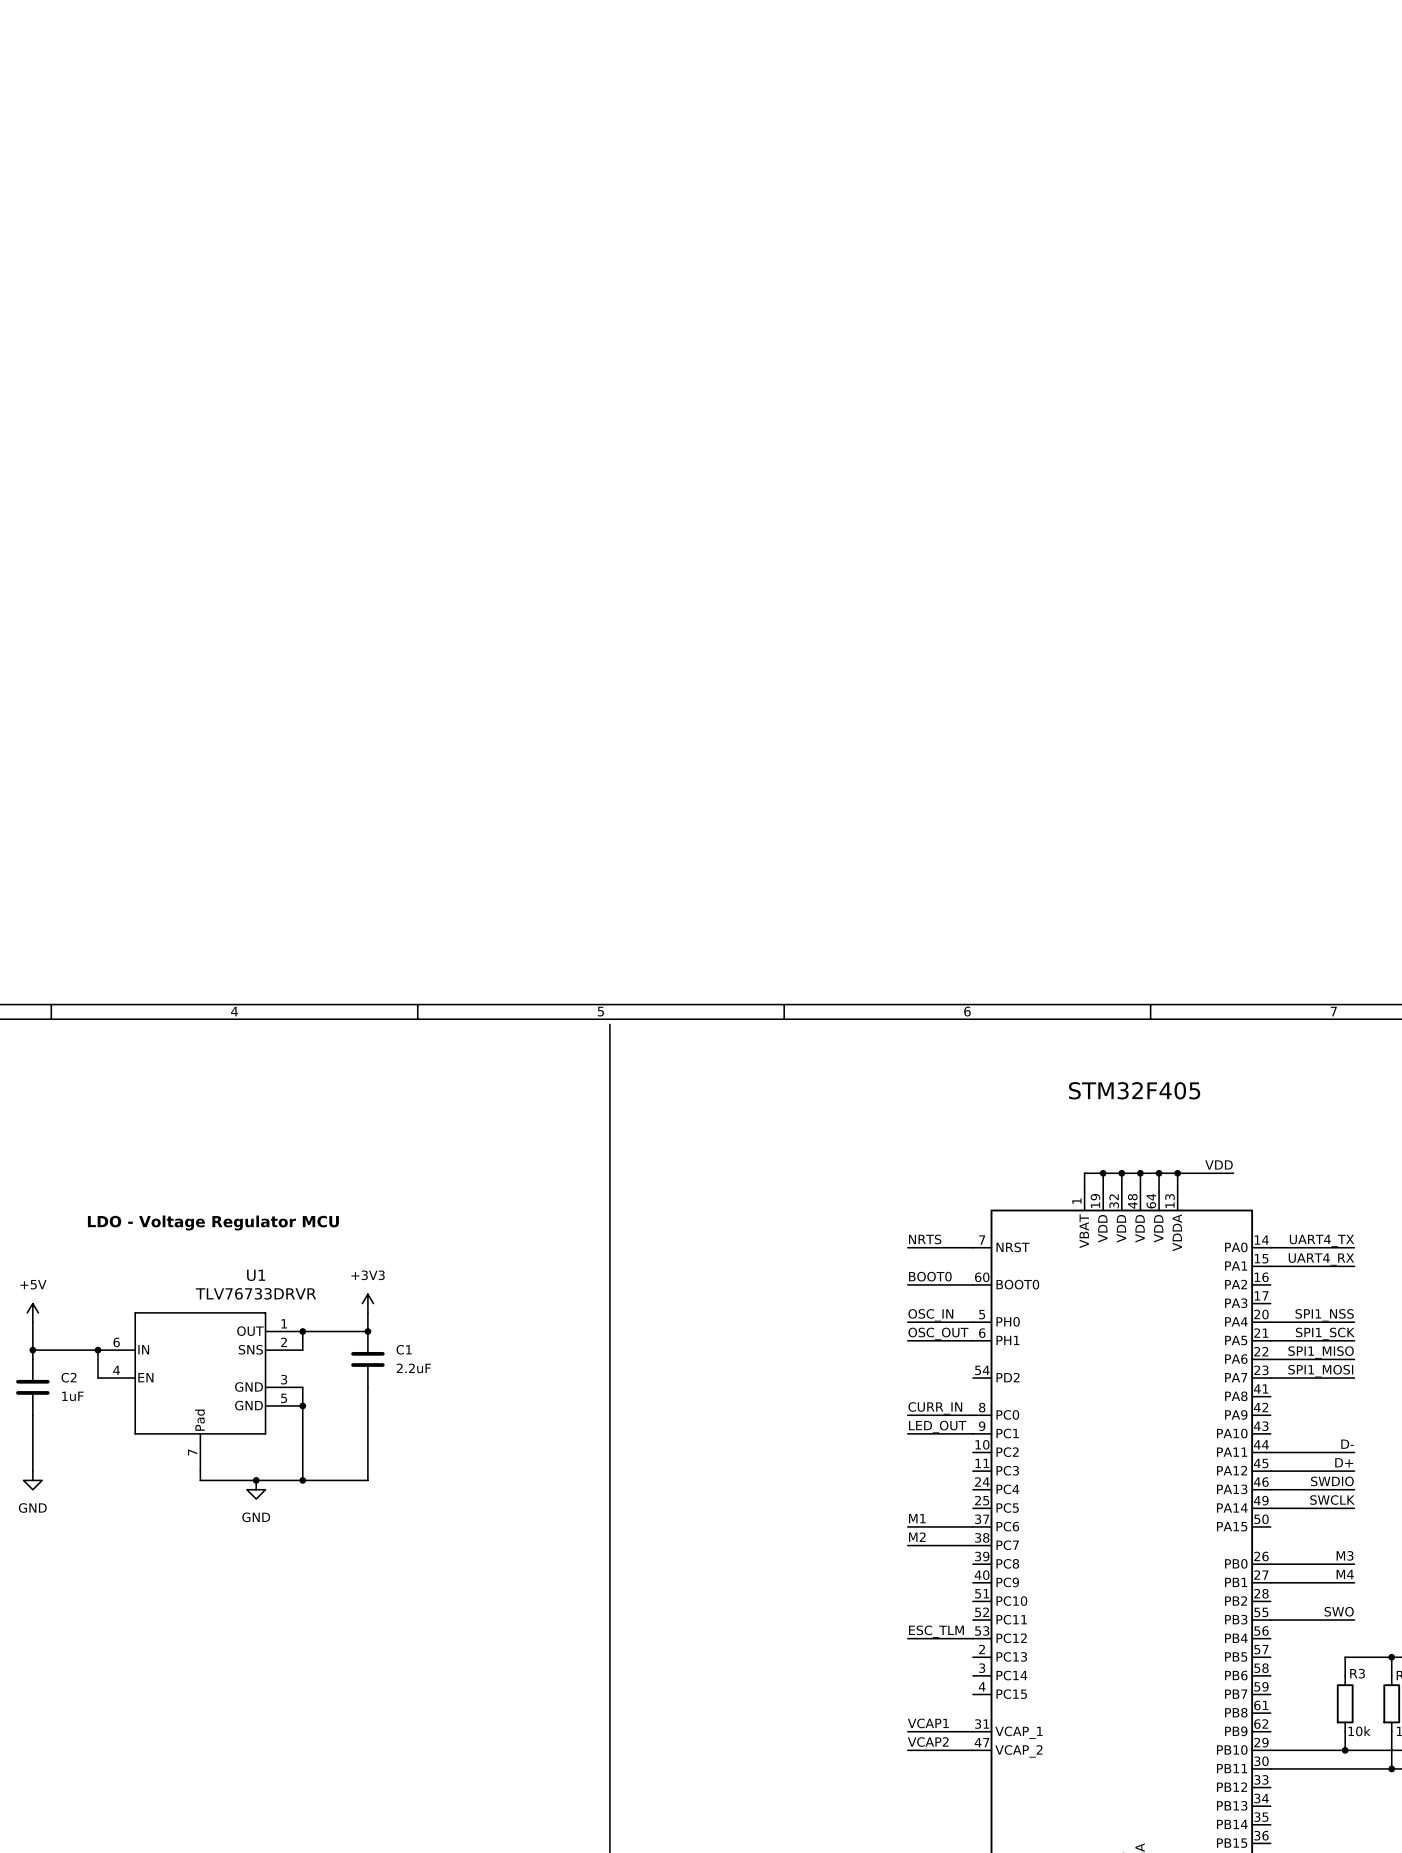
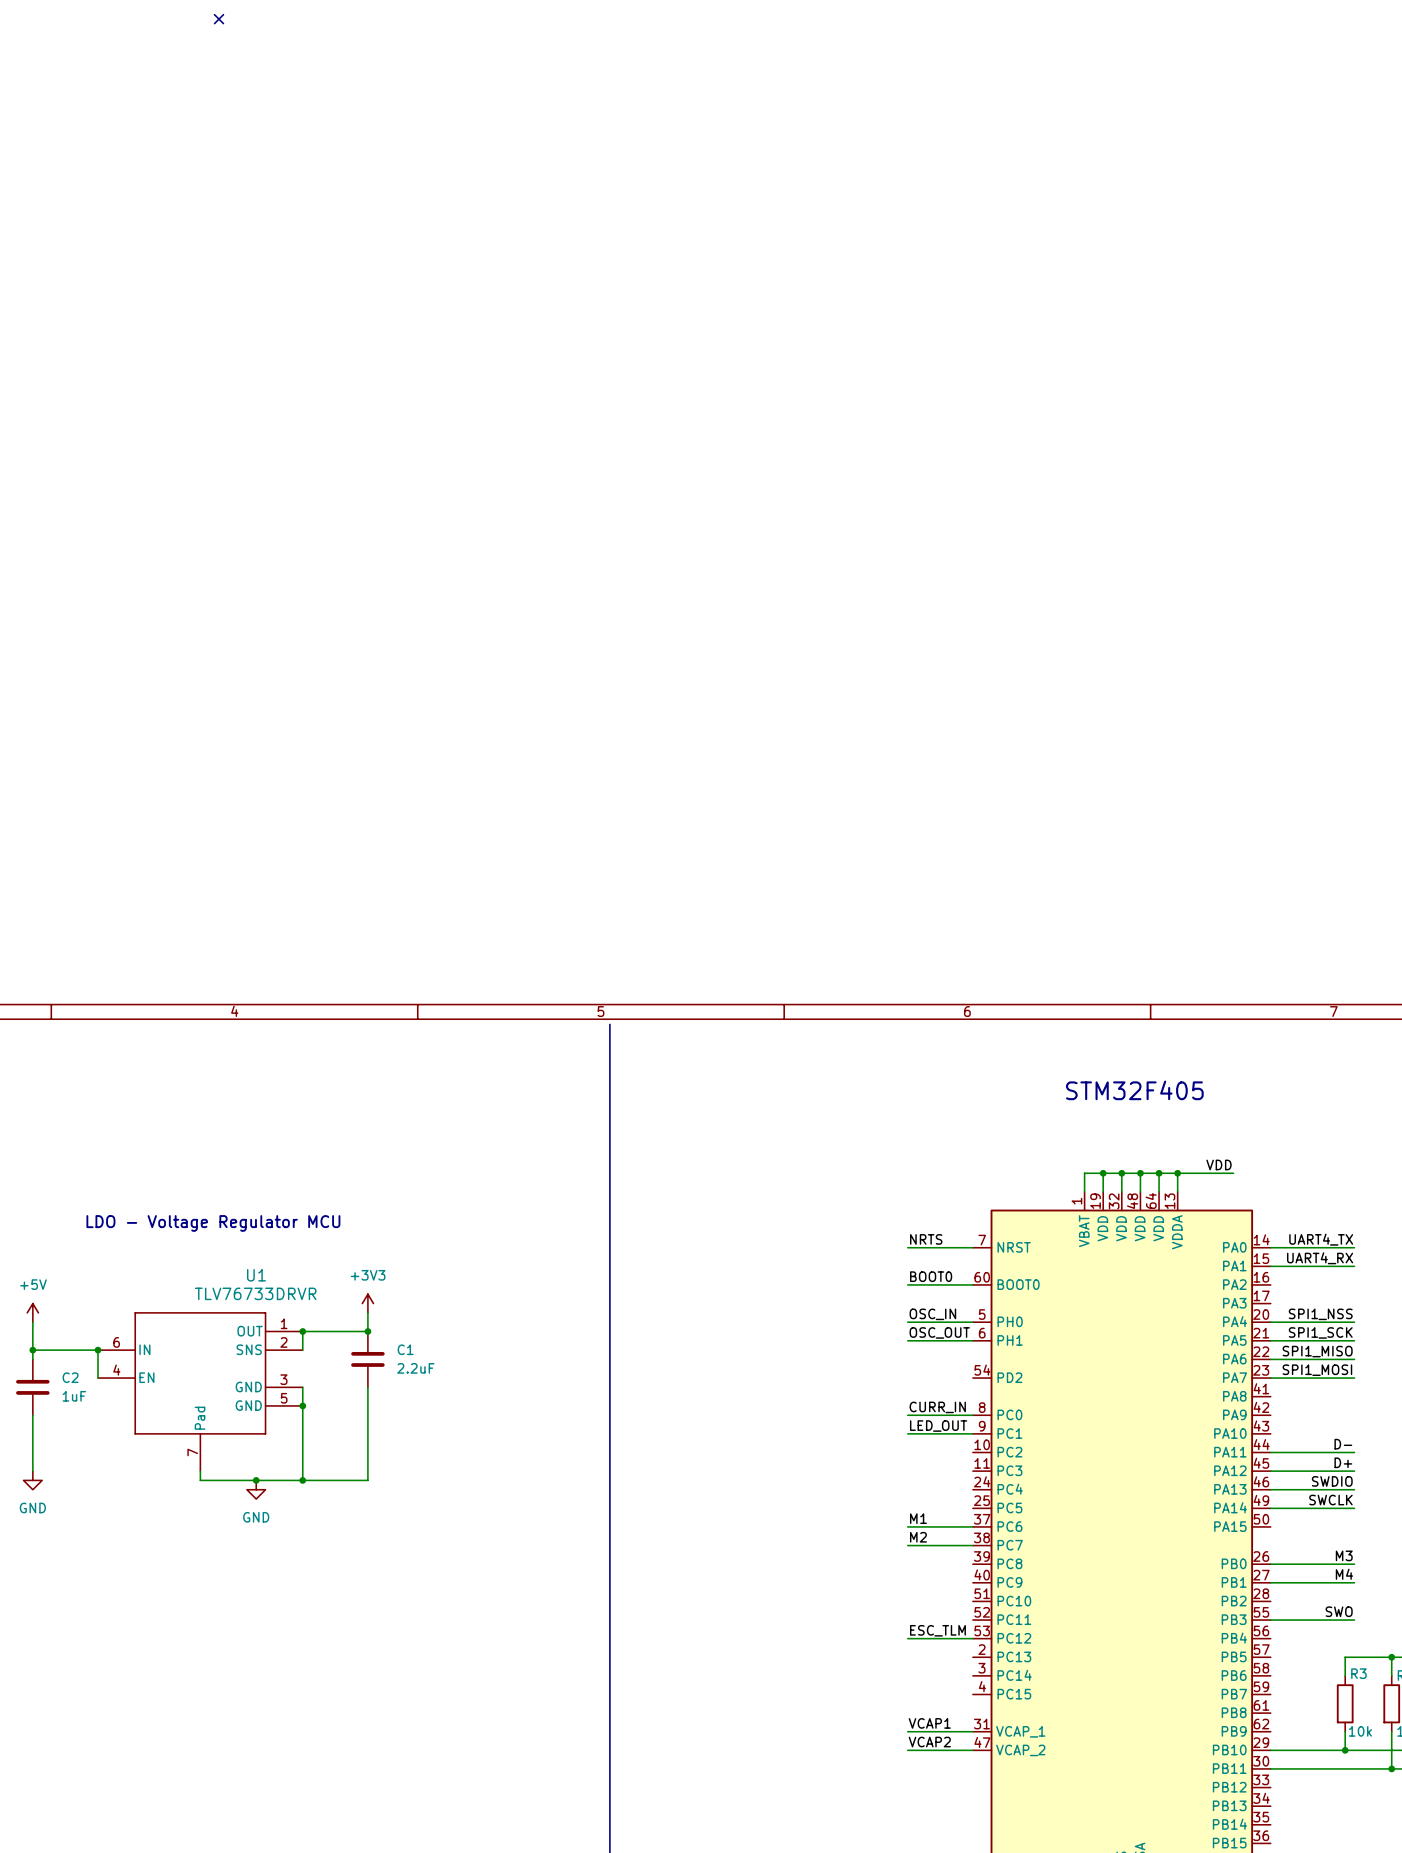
no-connect mark: none -> (218, 19)

